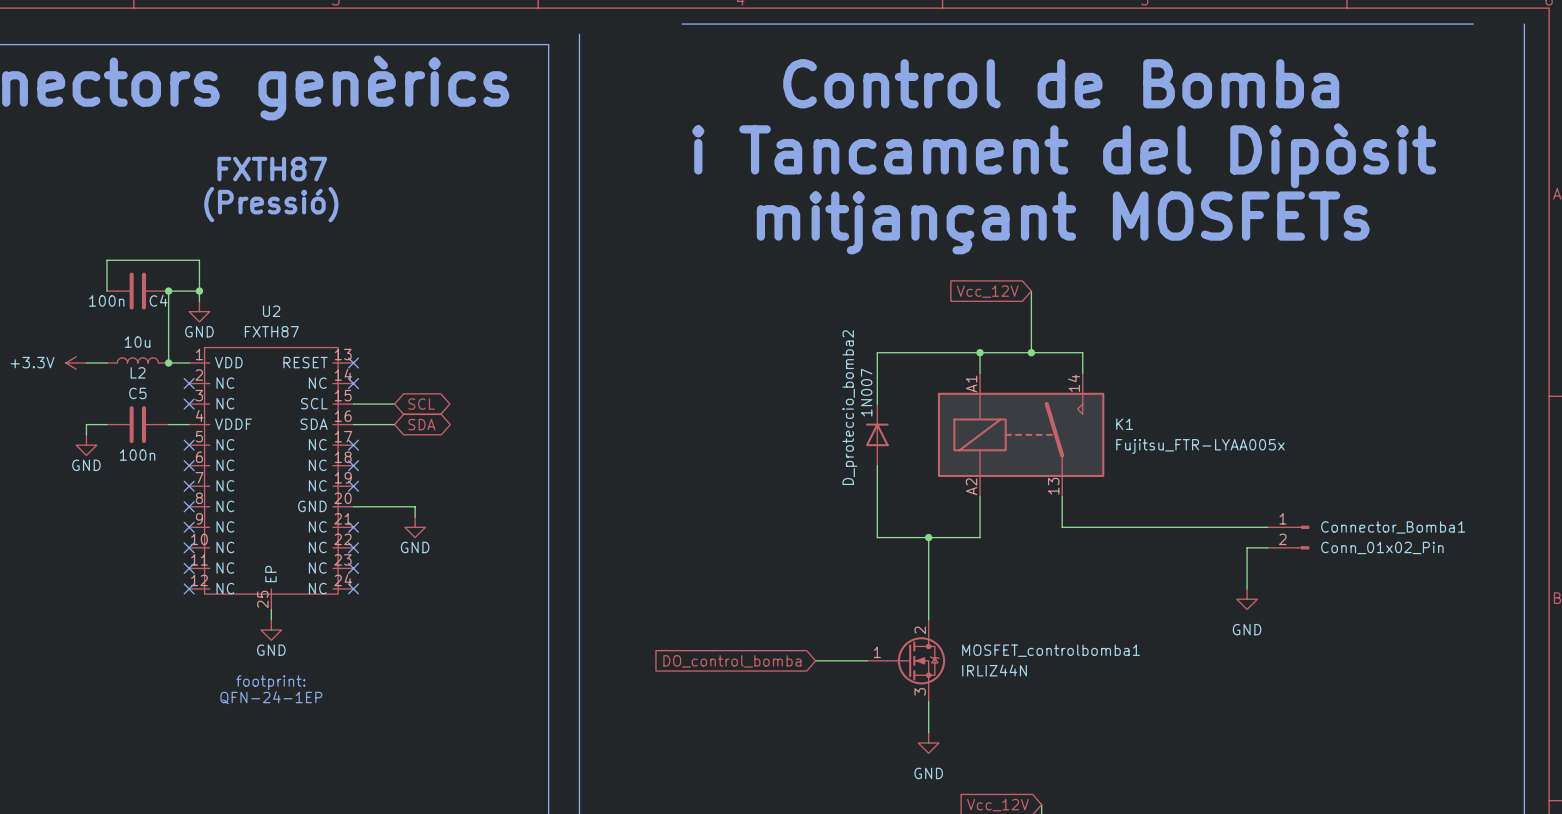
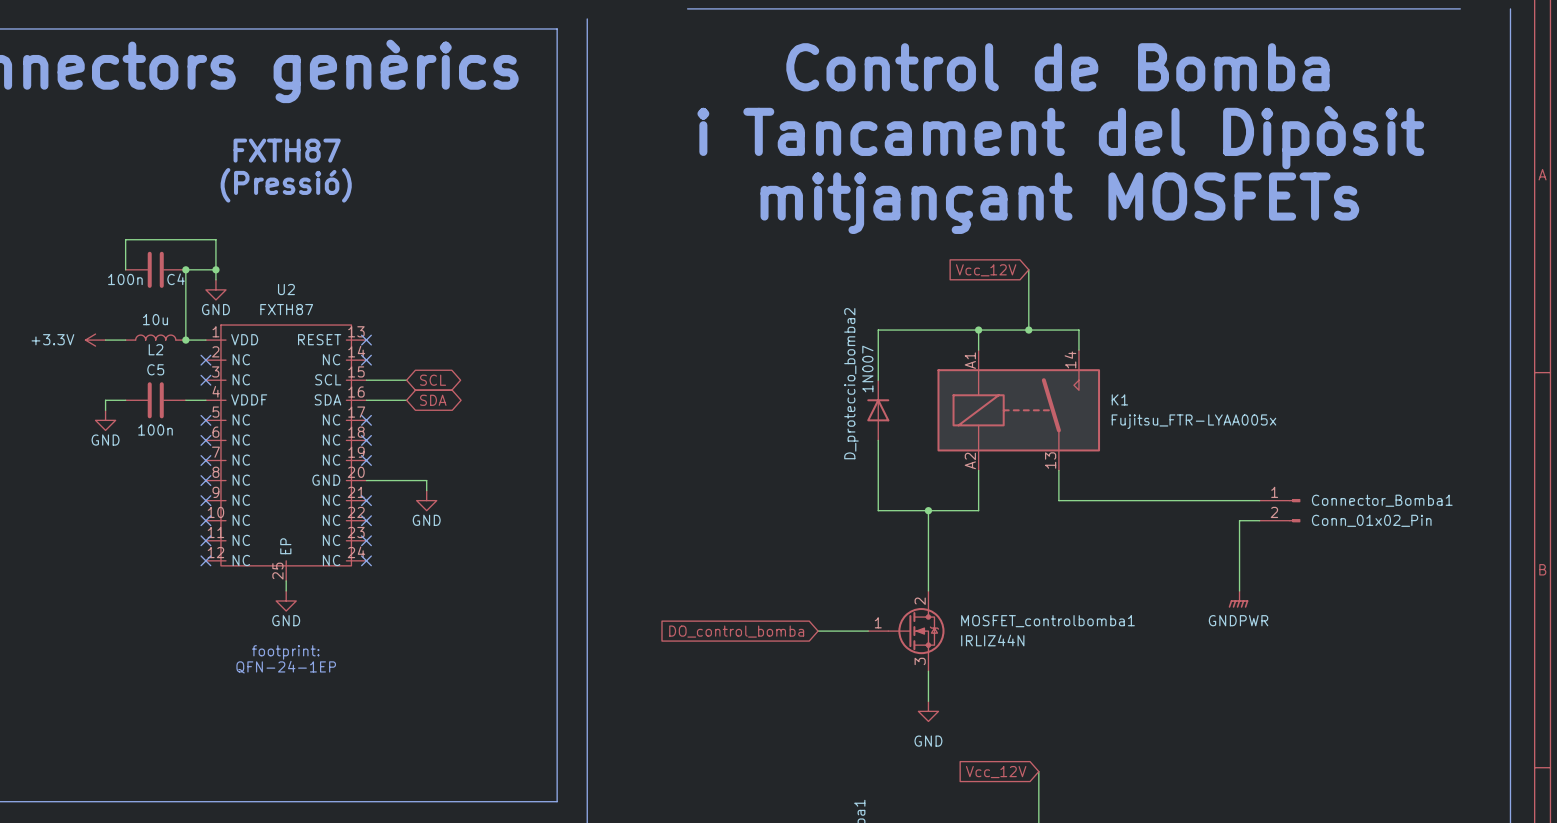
wire: none -> (1239, 560) (1239, 590)
power symbol: GND (1247, 599) -> none
power symbol: none -> GNDPWR (1238, 599)

